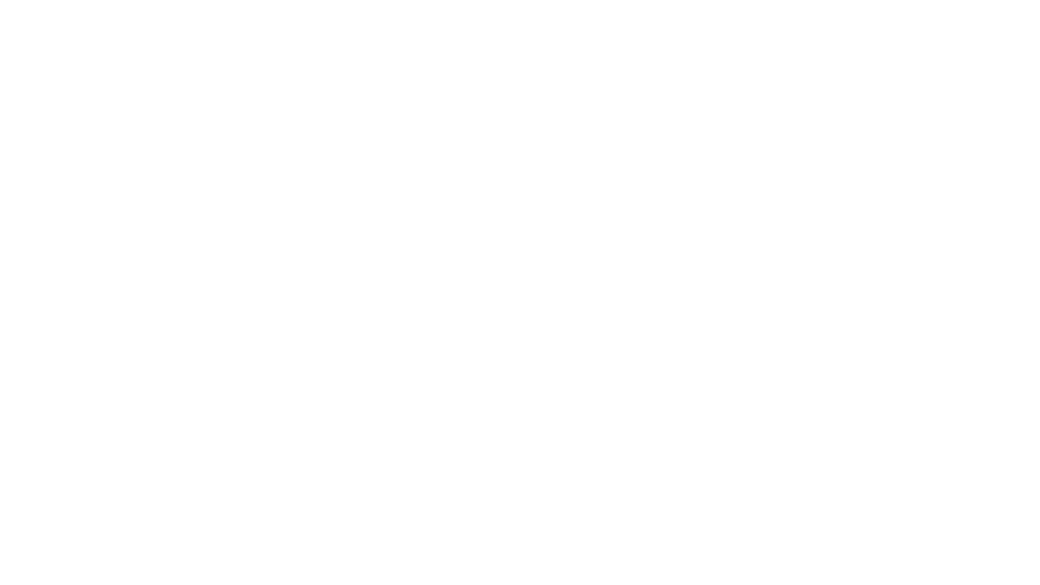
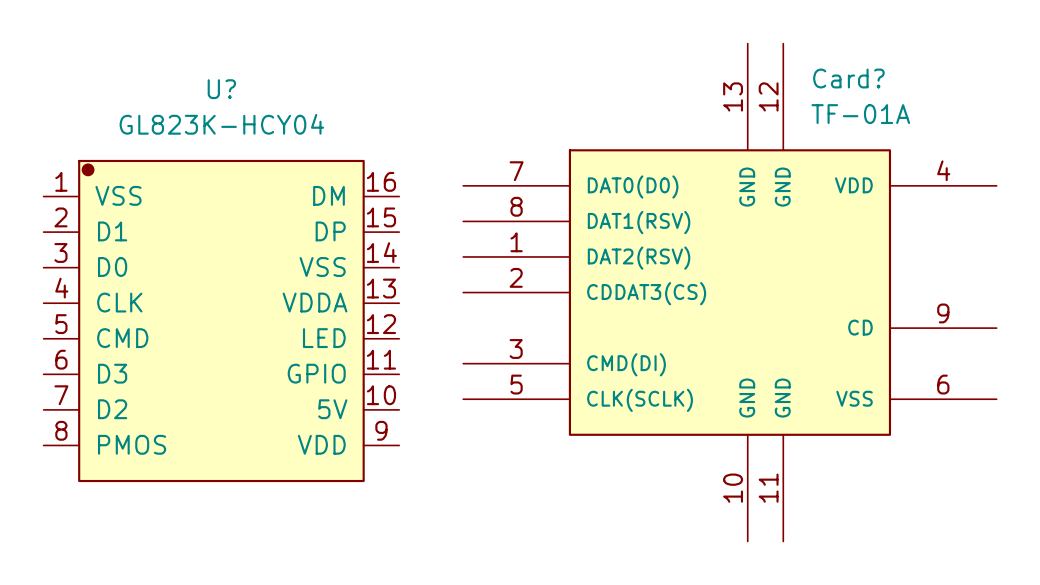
Card?: none -> TF-01A (729, 292)
U?: none -> GL823K-HCY04 (221, 320)

